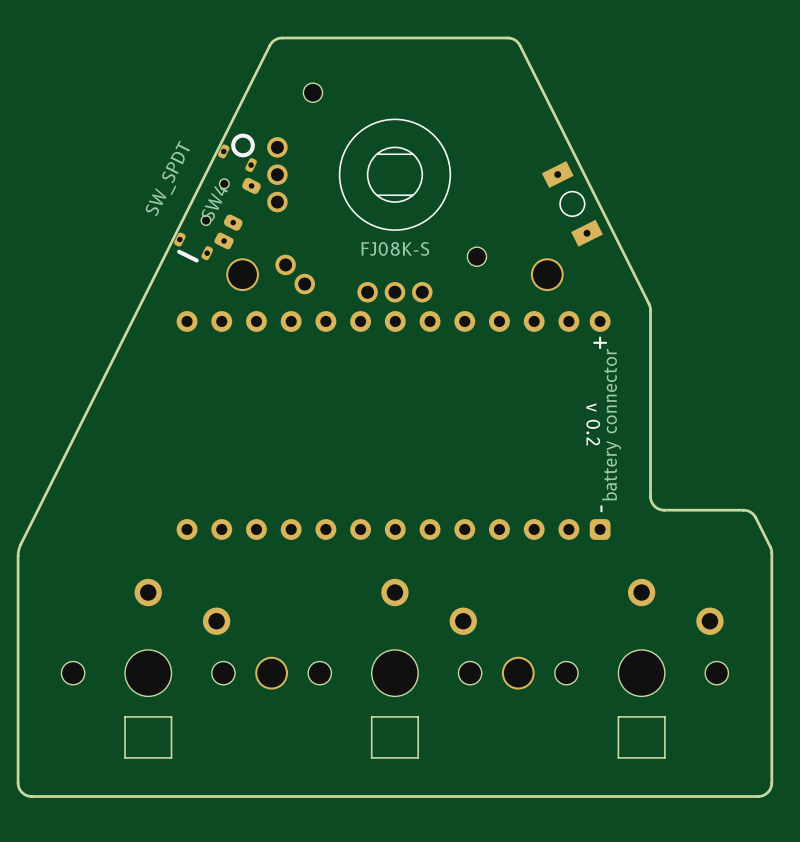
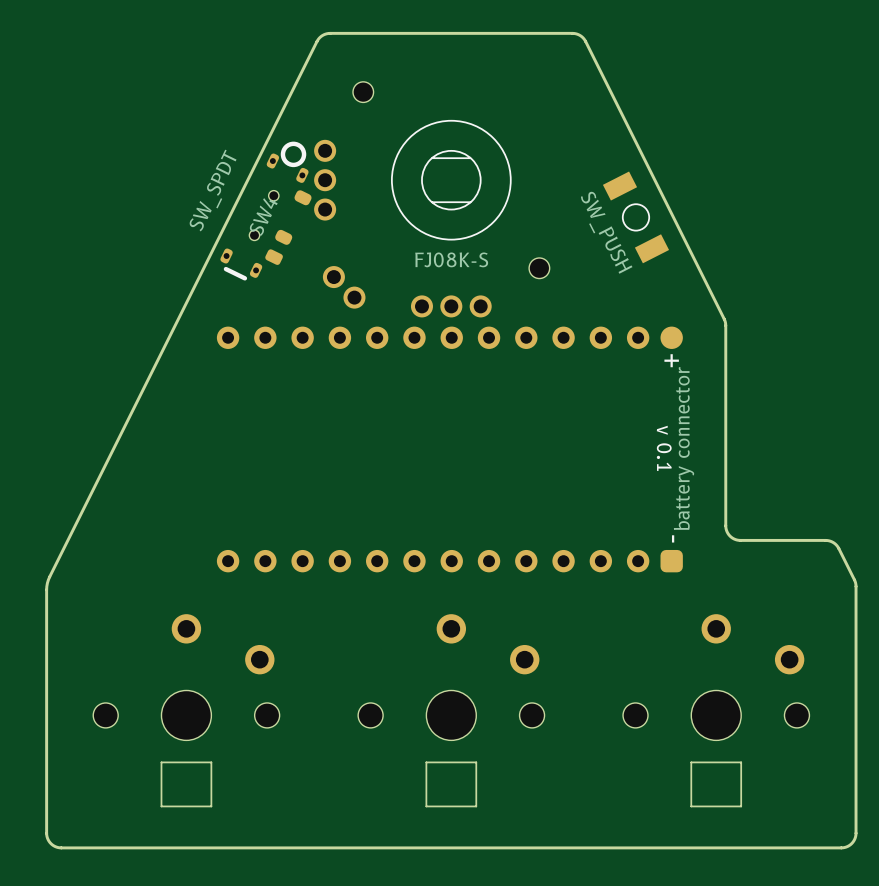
SW4 footprint: [174, 133, 261, 263] -> [220, 141, 312, 281]
part footprint: [541, 161, 603, 247] -> [602, 171, 670, 264]
part value: none -> SW_PUSH (606, 232)
part: (242, 274) -> none
part: (547, 274) -> none
part footprint: [589, 311, 611, 540] -> [660, 326, 683, 573]
text: v 0.2 (593, 424) -> v 0.1 (664, 448)
part: (271, 673) -> none
part: (518, 673) -> none

